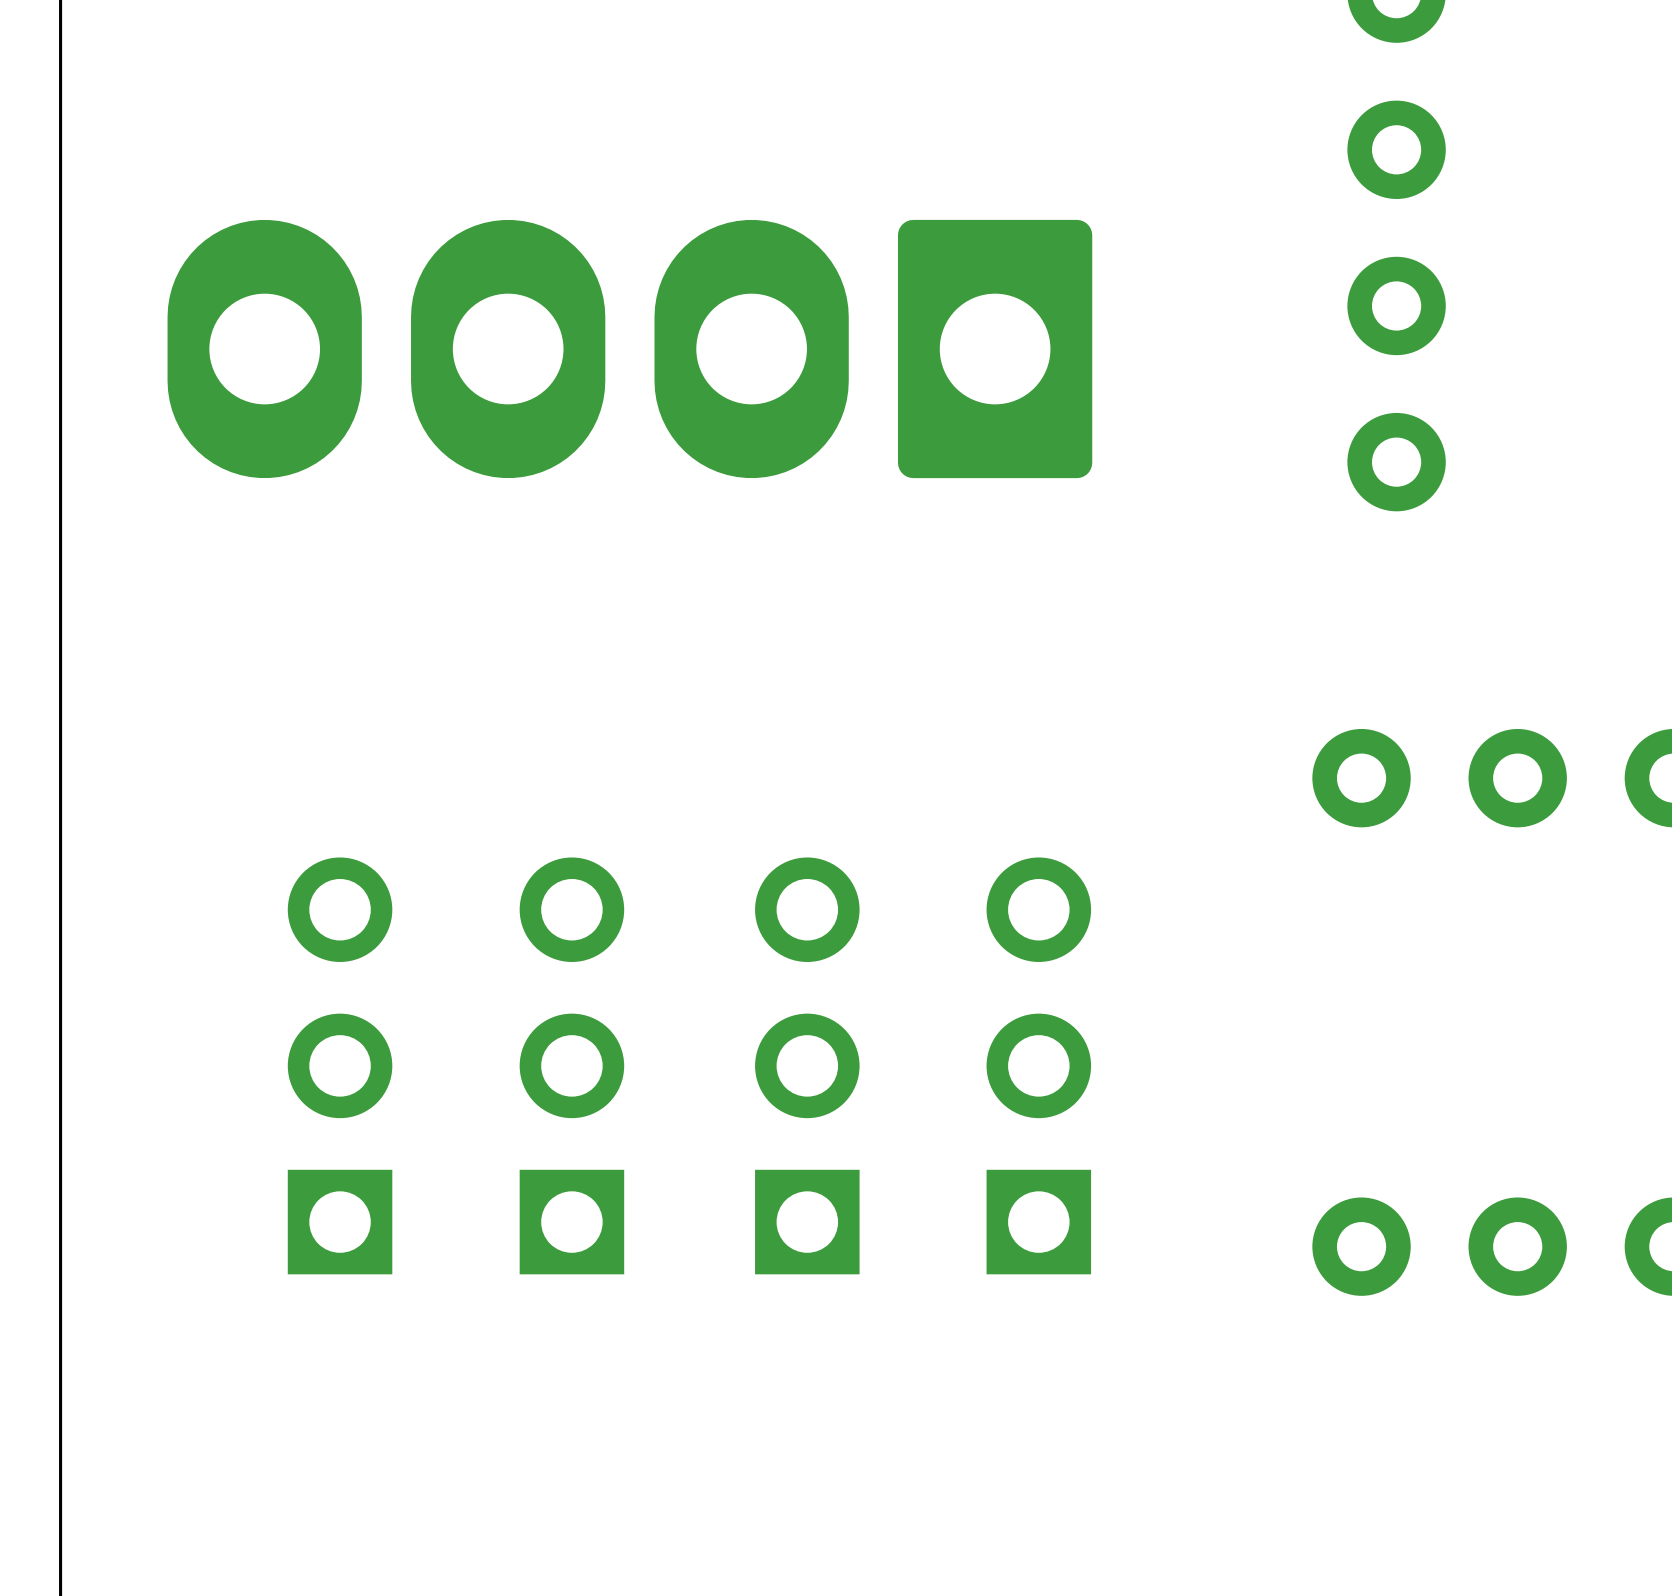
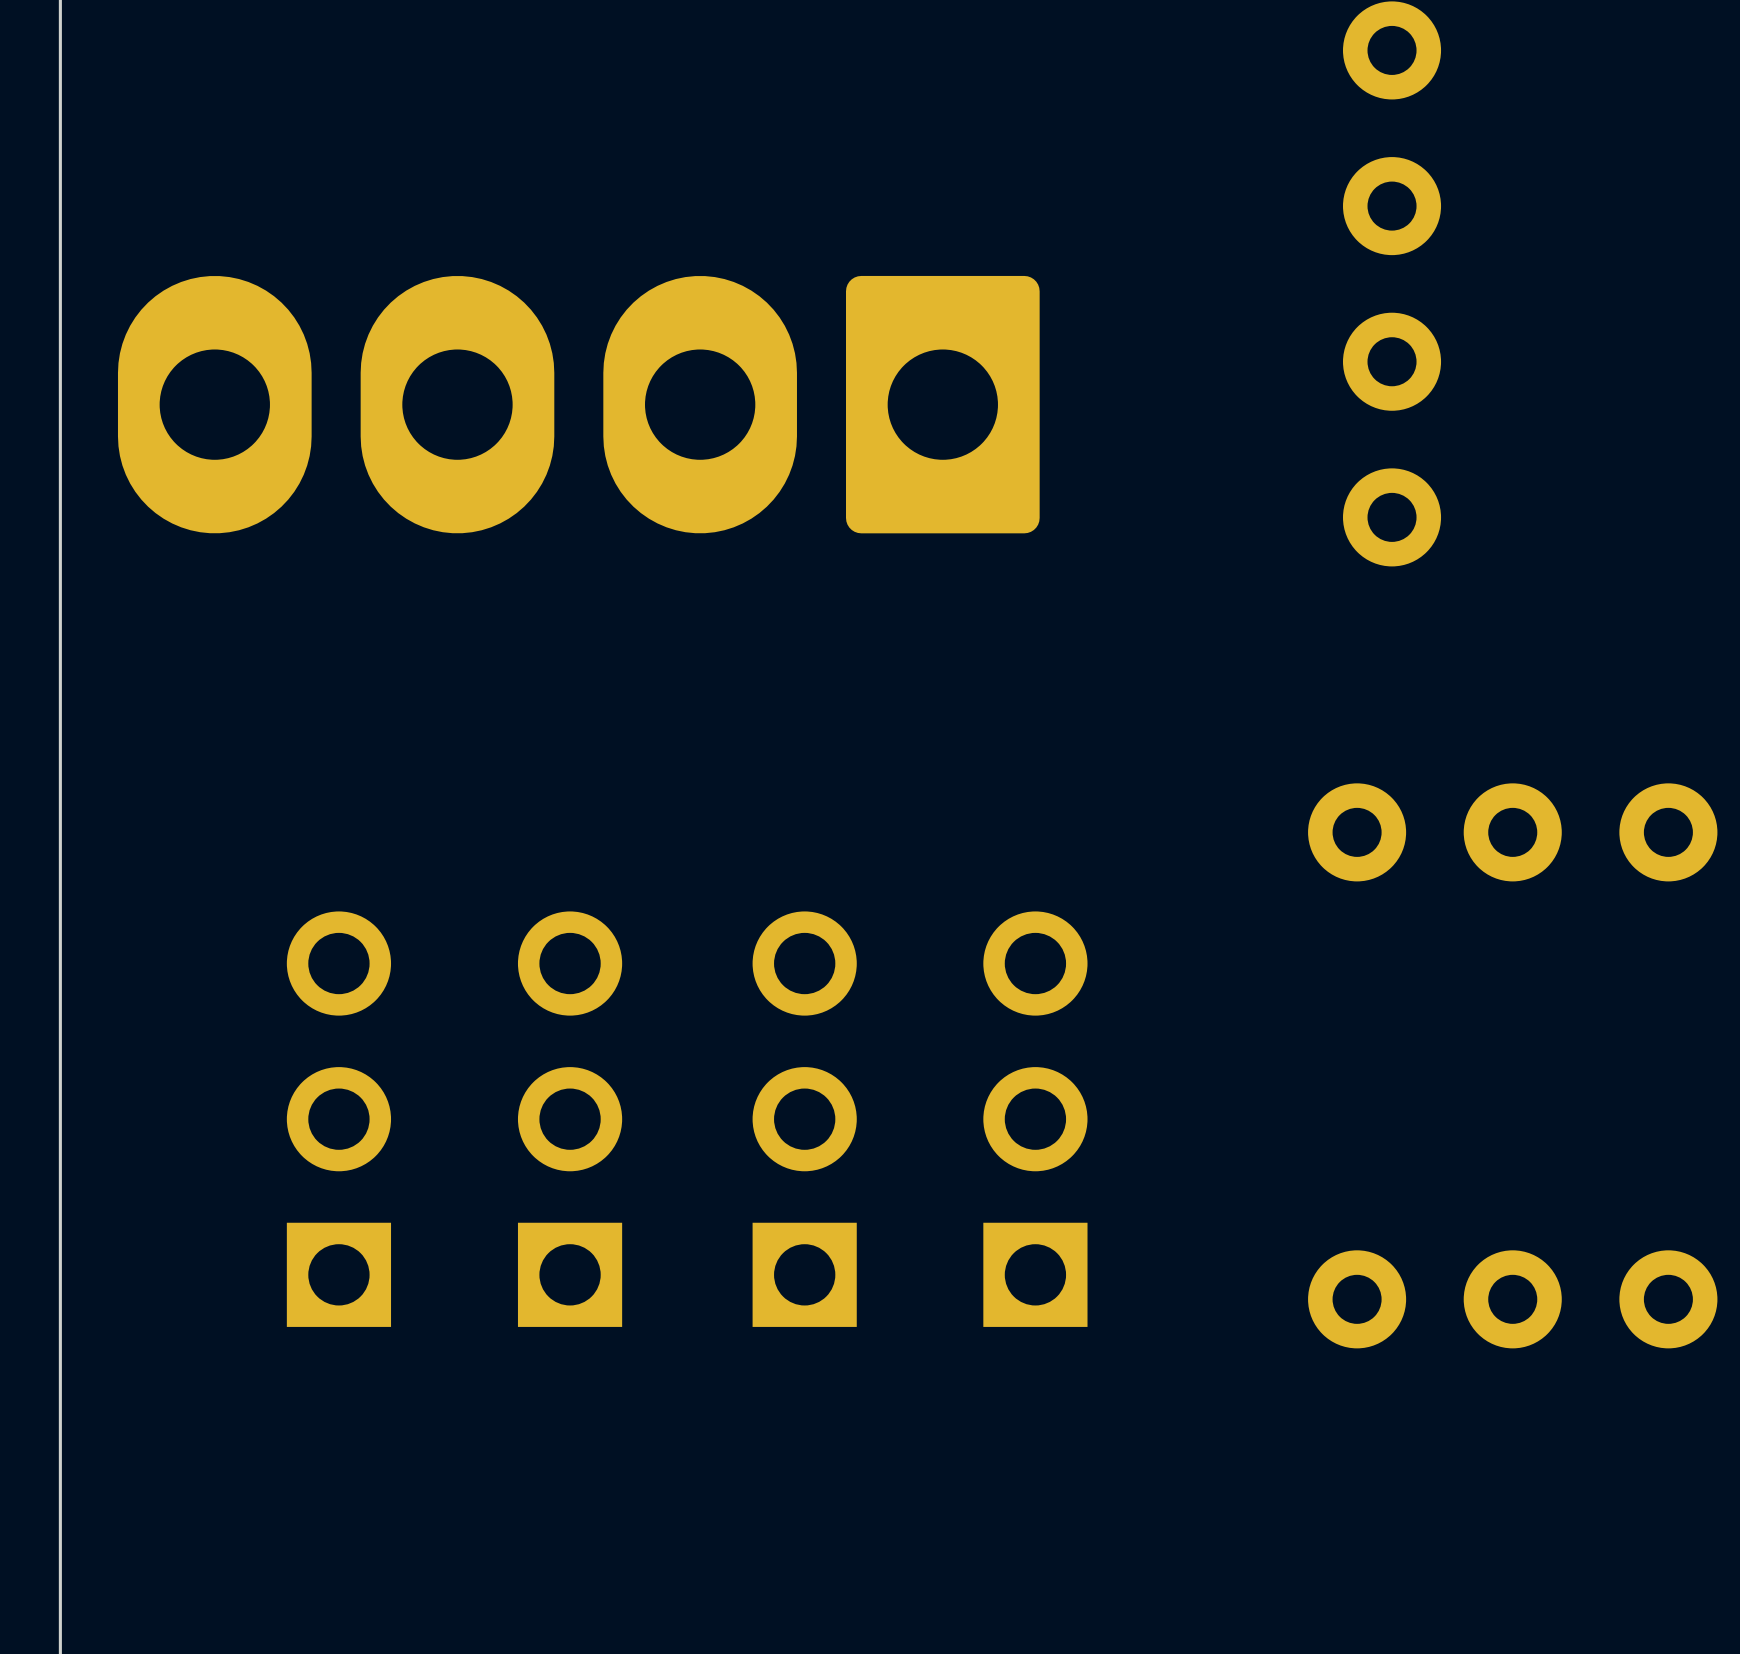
part position: (629, 349) -> (578, 404)

